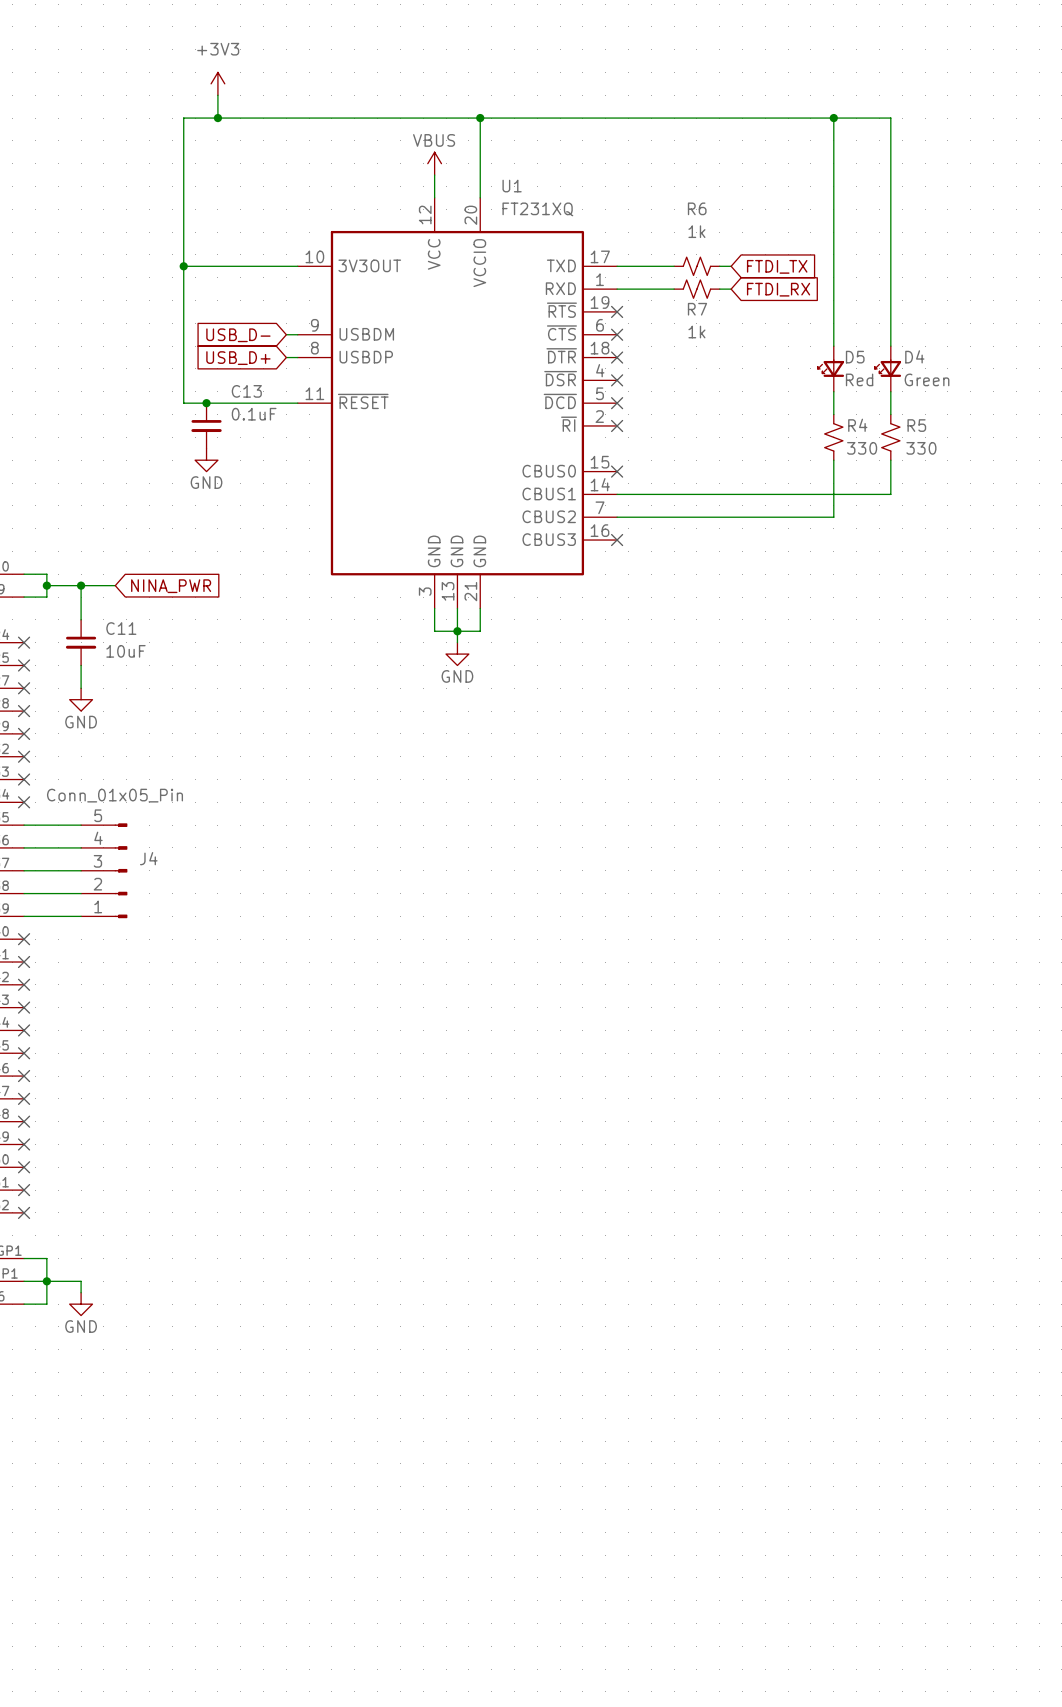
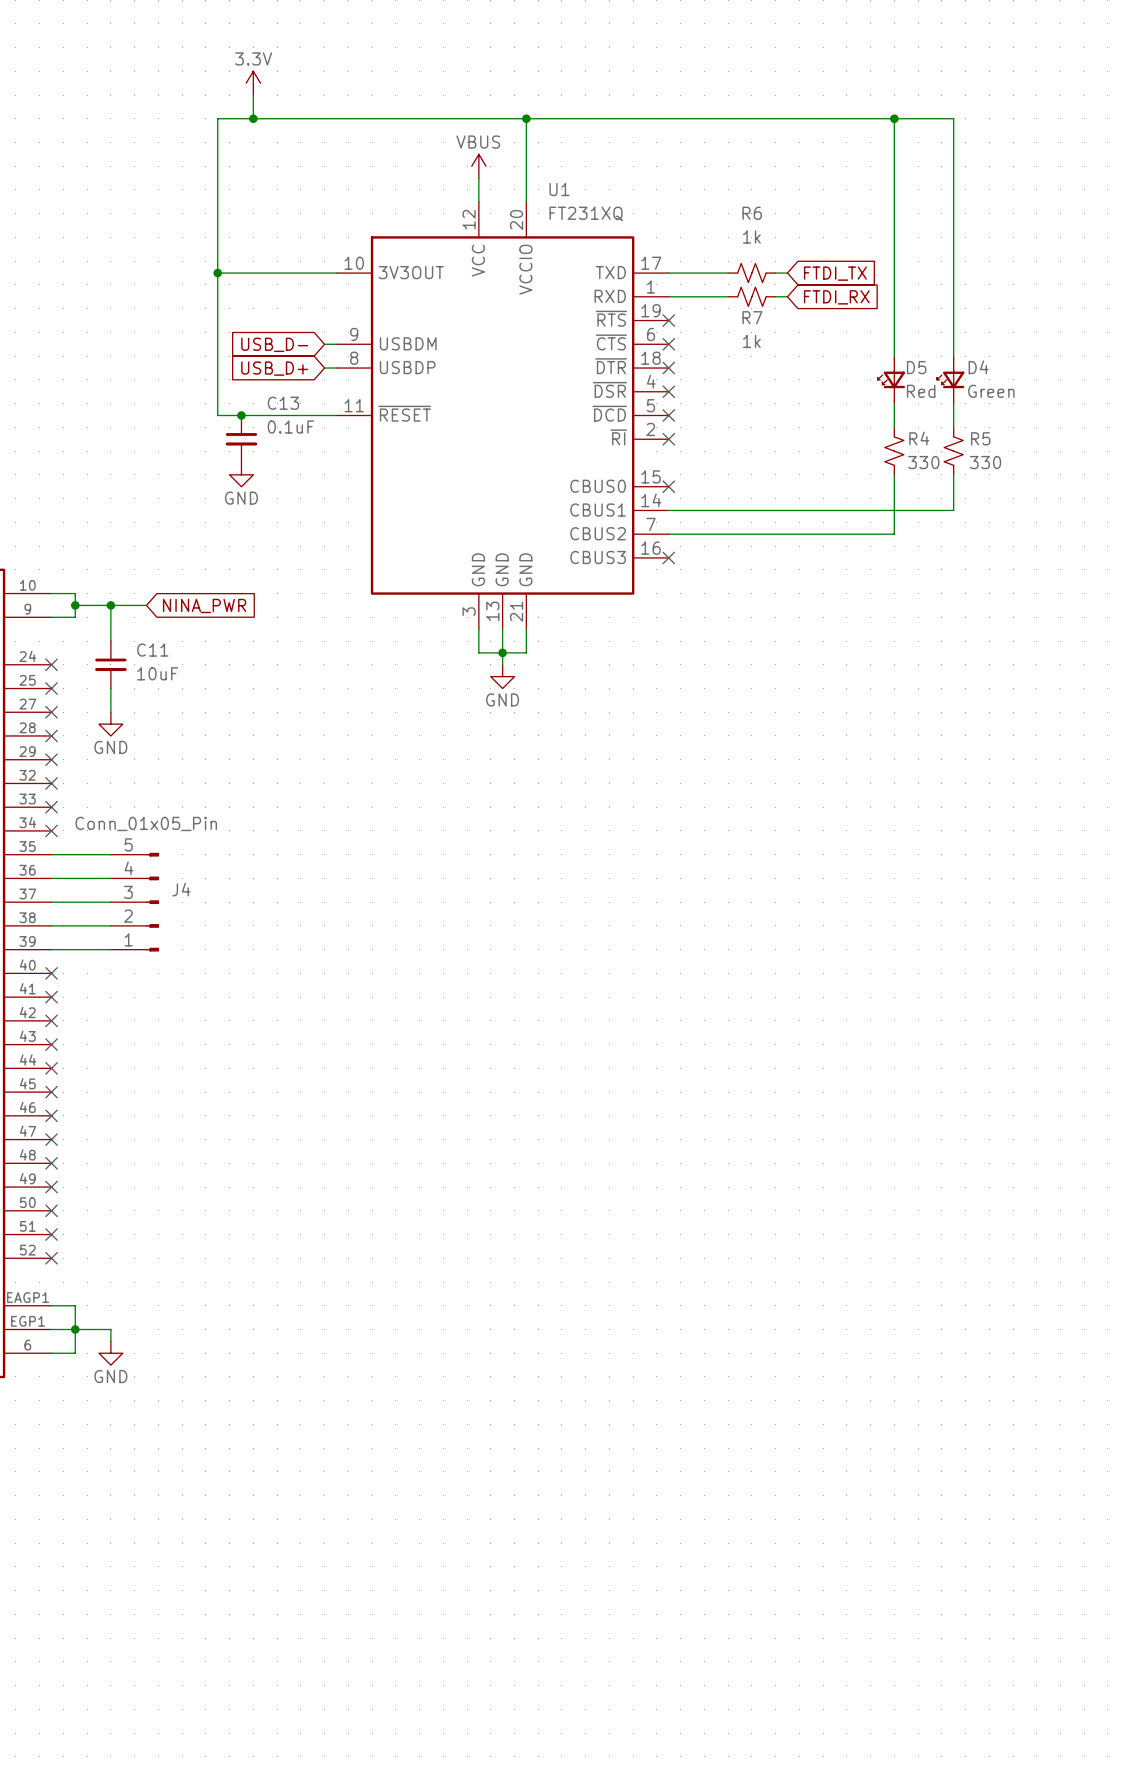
power symbol: +3V3 (217, 83) -> 3.3V (253, 83)

